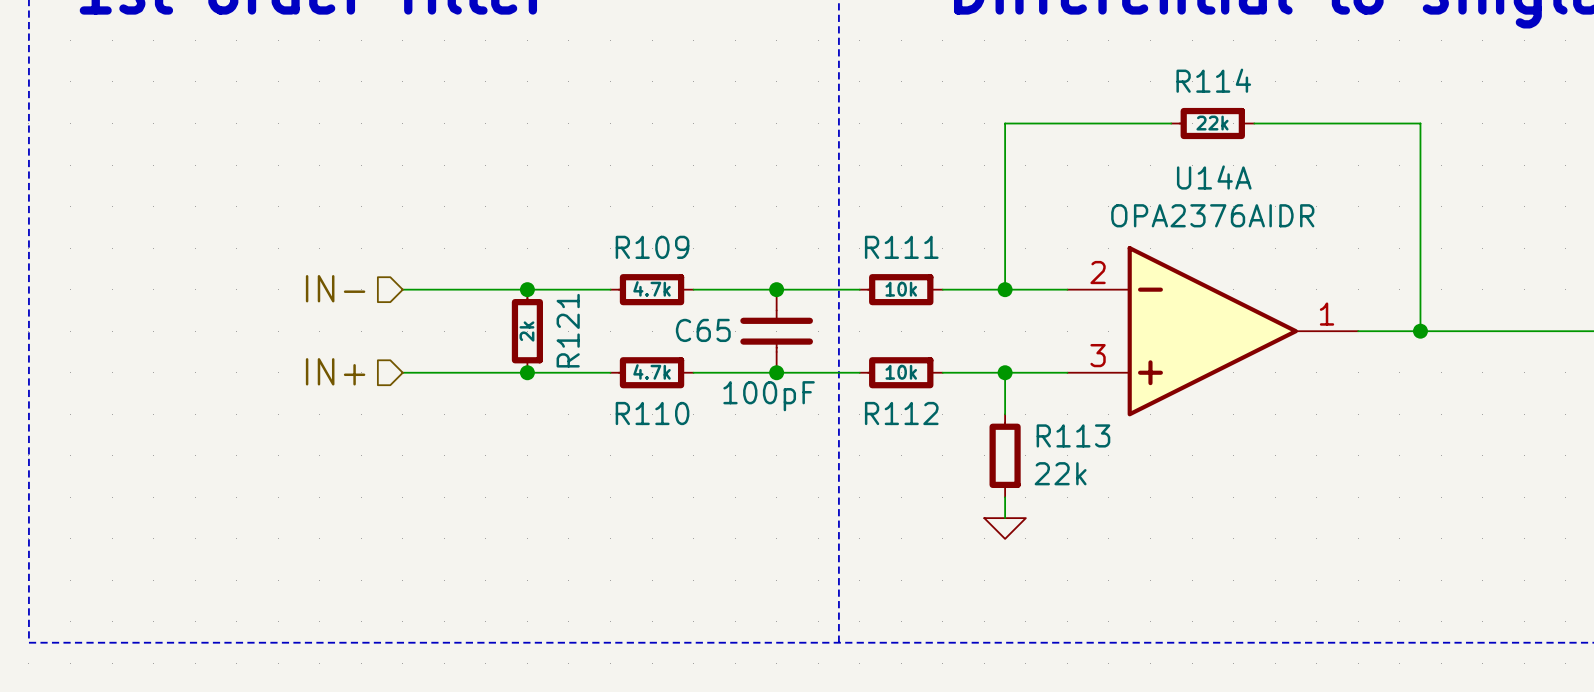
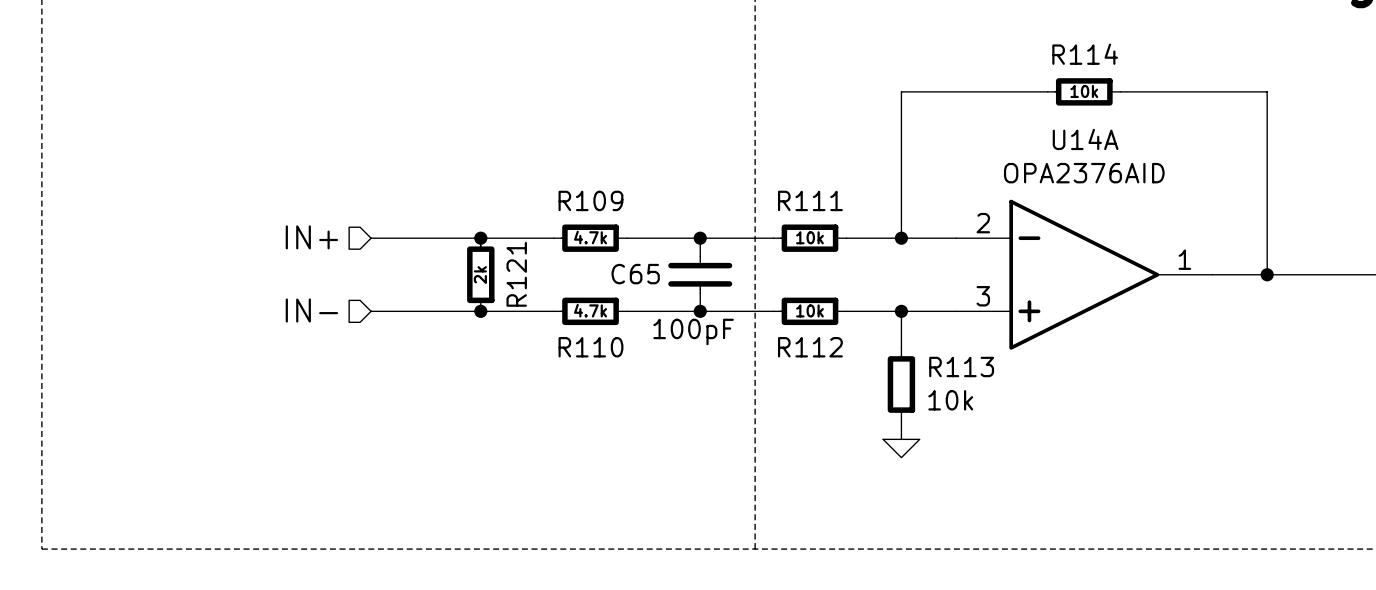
R114 value: 22k (1212, 123) -> 10k (1084, 91)
U14A value: OPA2376AIDR (1212, 215) -> OPA2376AID (1084, 173)
hierarchical label: IN- (335, 288) -> IN+ (311, 237)
hierarchical label: IN+ (335, 371) -> IN- (311, 310)
R113 value: 22k (1060, 473) -> 10k (950, 400)

